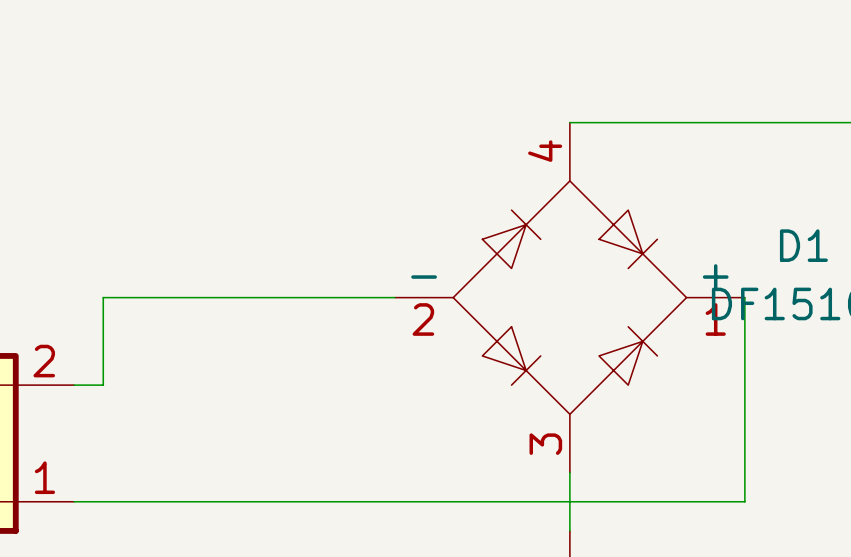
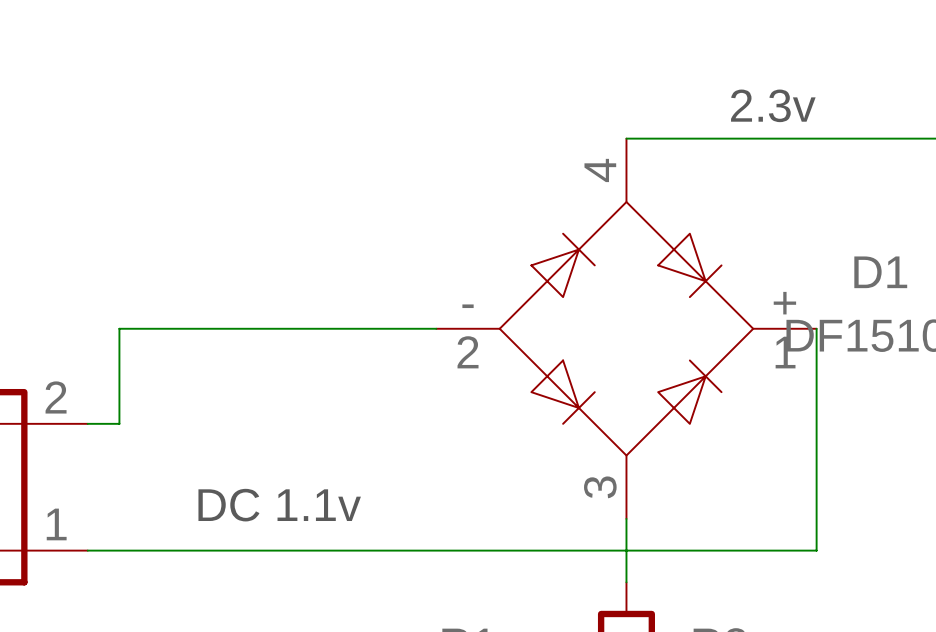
text: none -> 2.3v (773, 105)
text: none -> DC 1.1v (279, 505)

